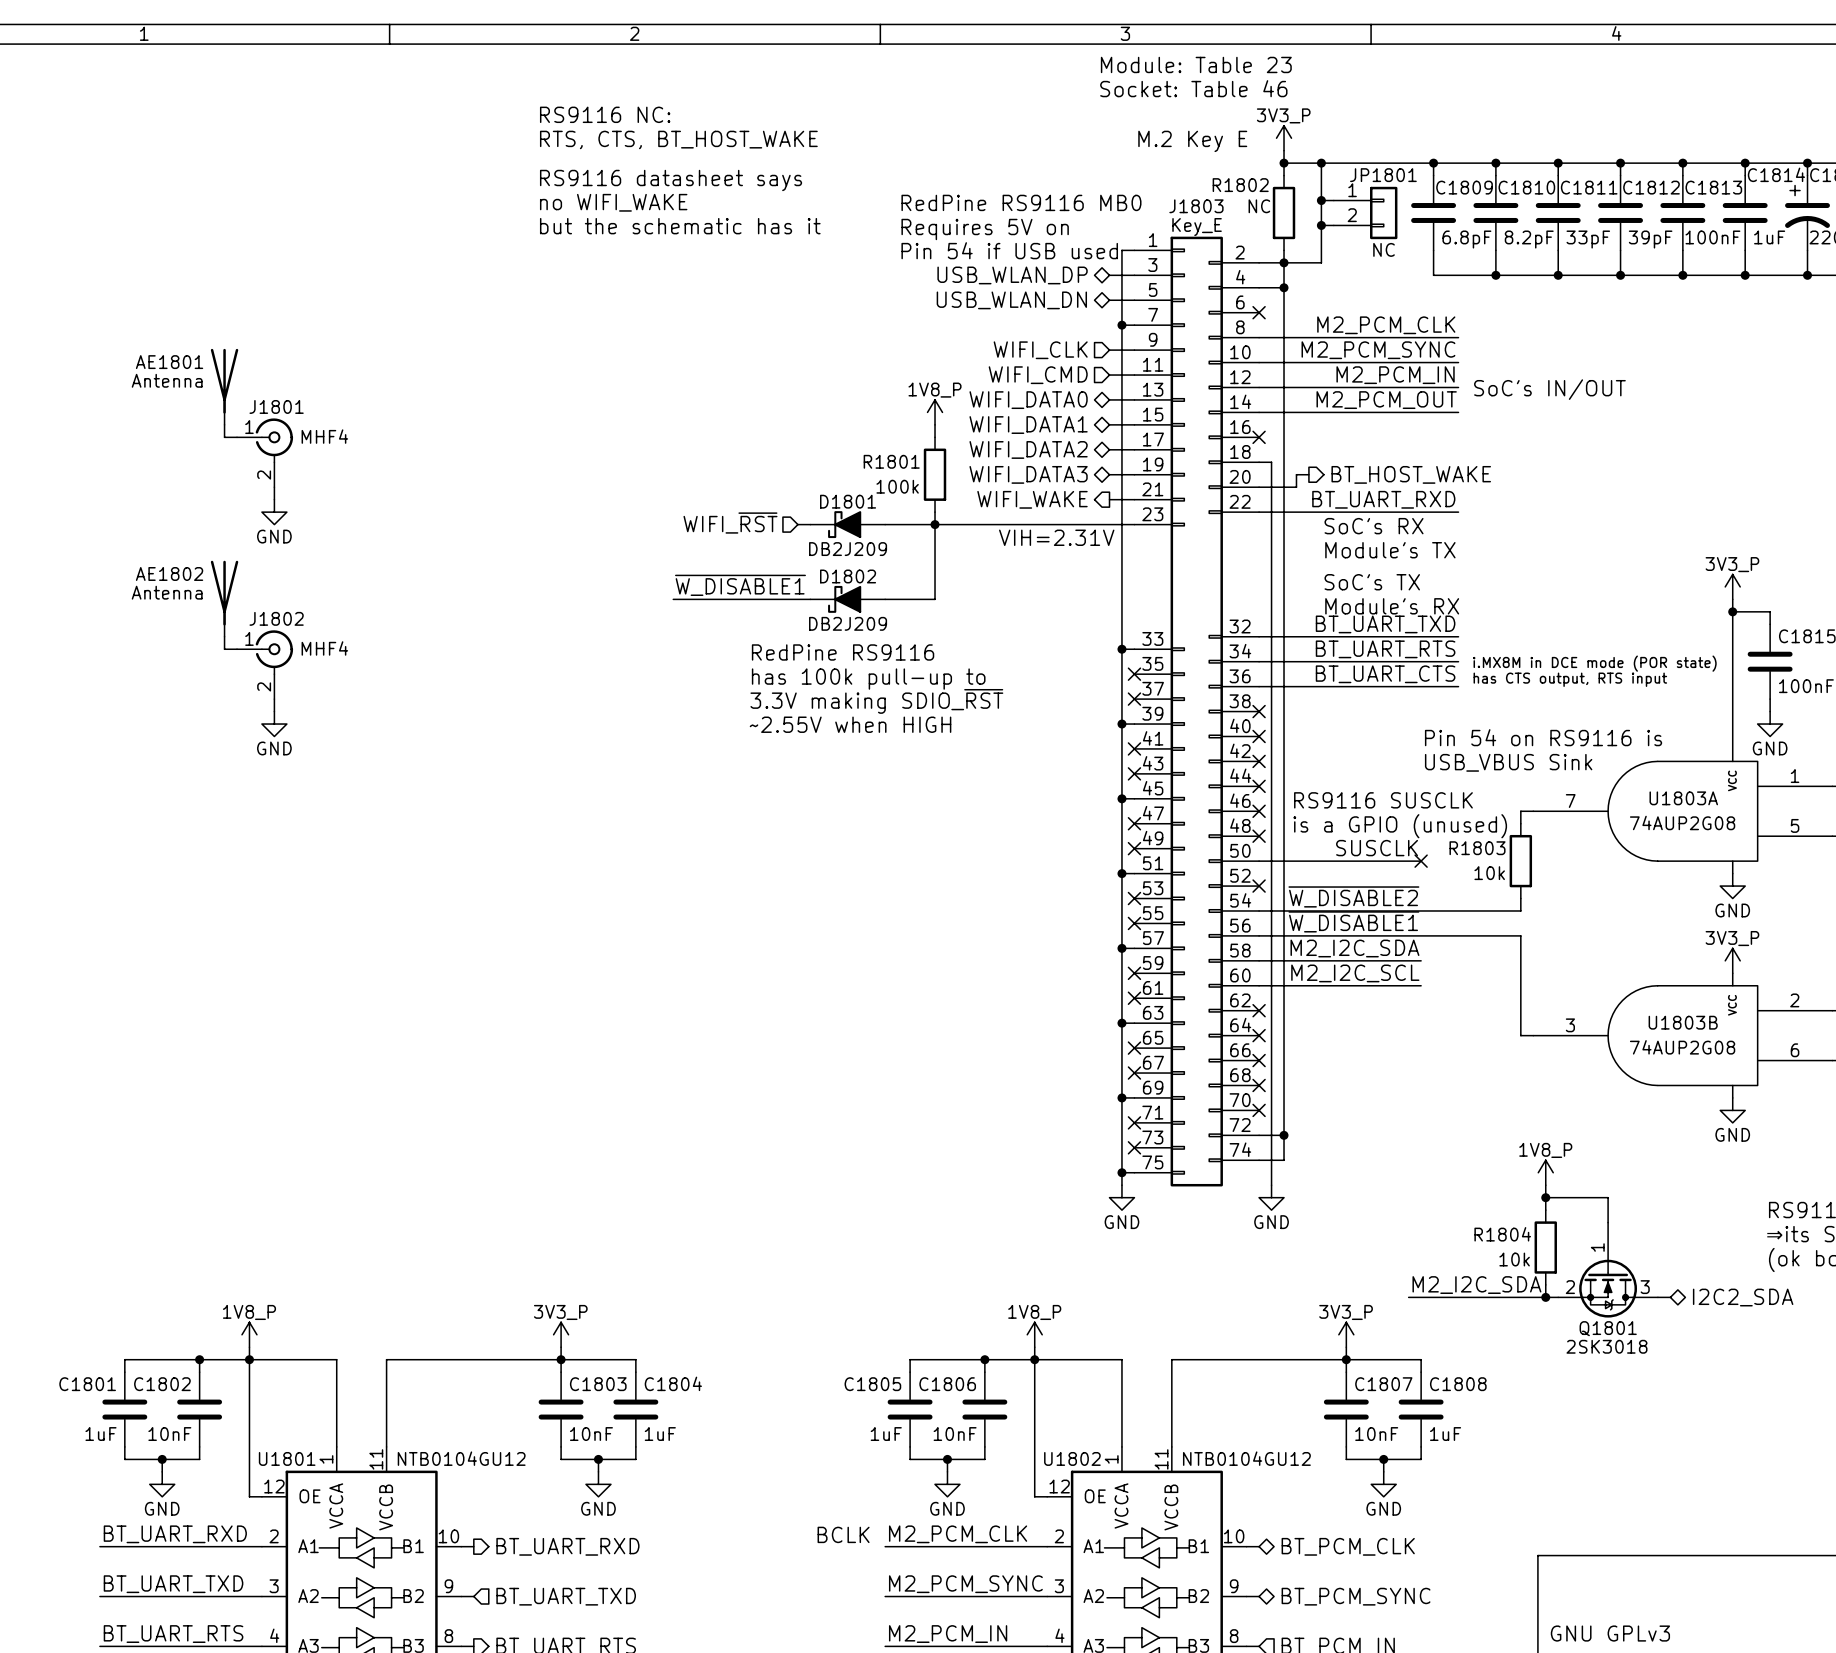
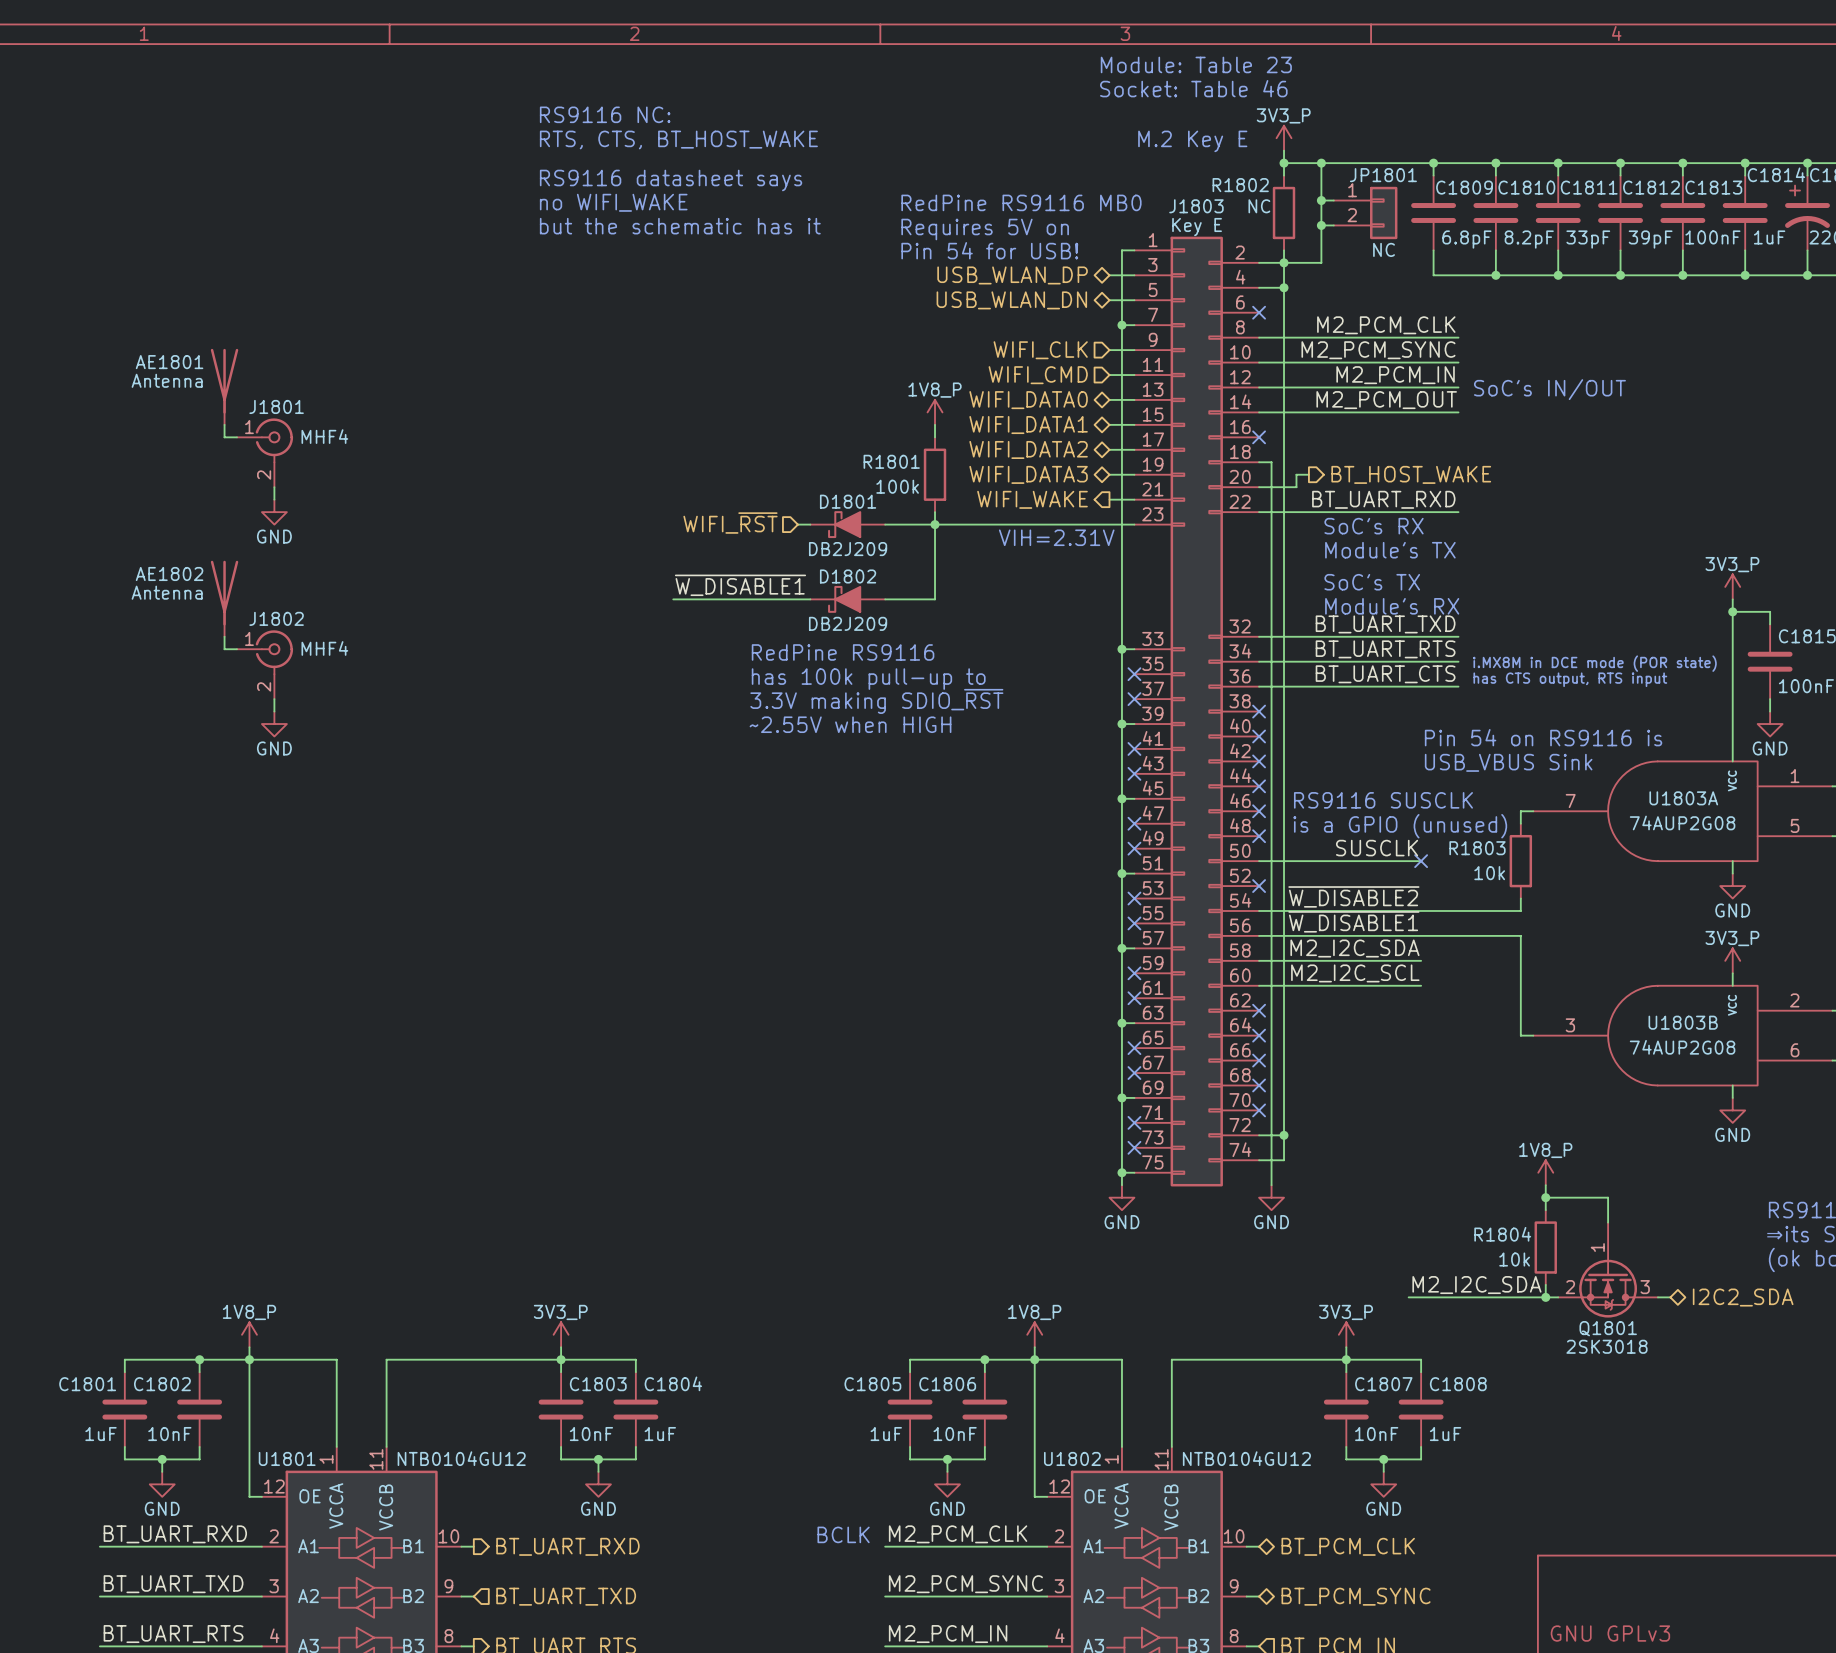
J1803 value: Key_E (1197, 227) -> Key E (1197, 227)
text: Pin 54 if USB used (1009, 250) -> Pin 54 for USB! (989, 250)

